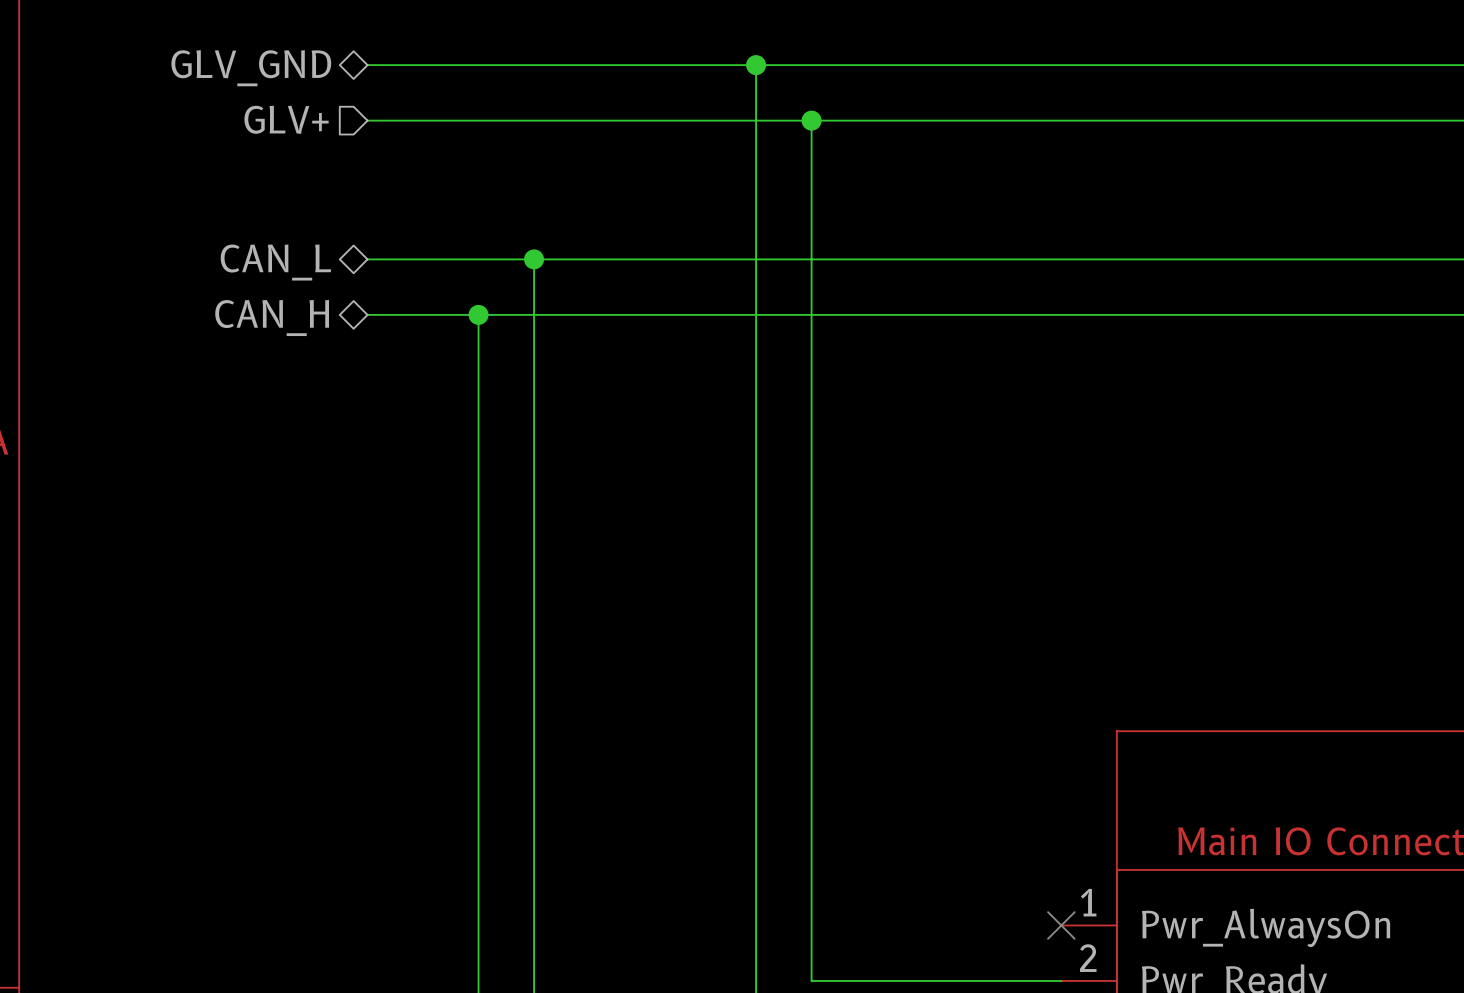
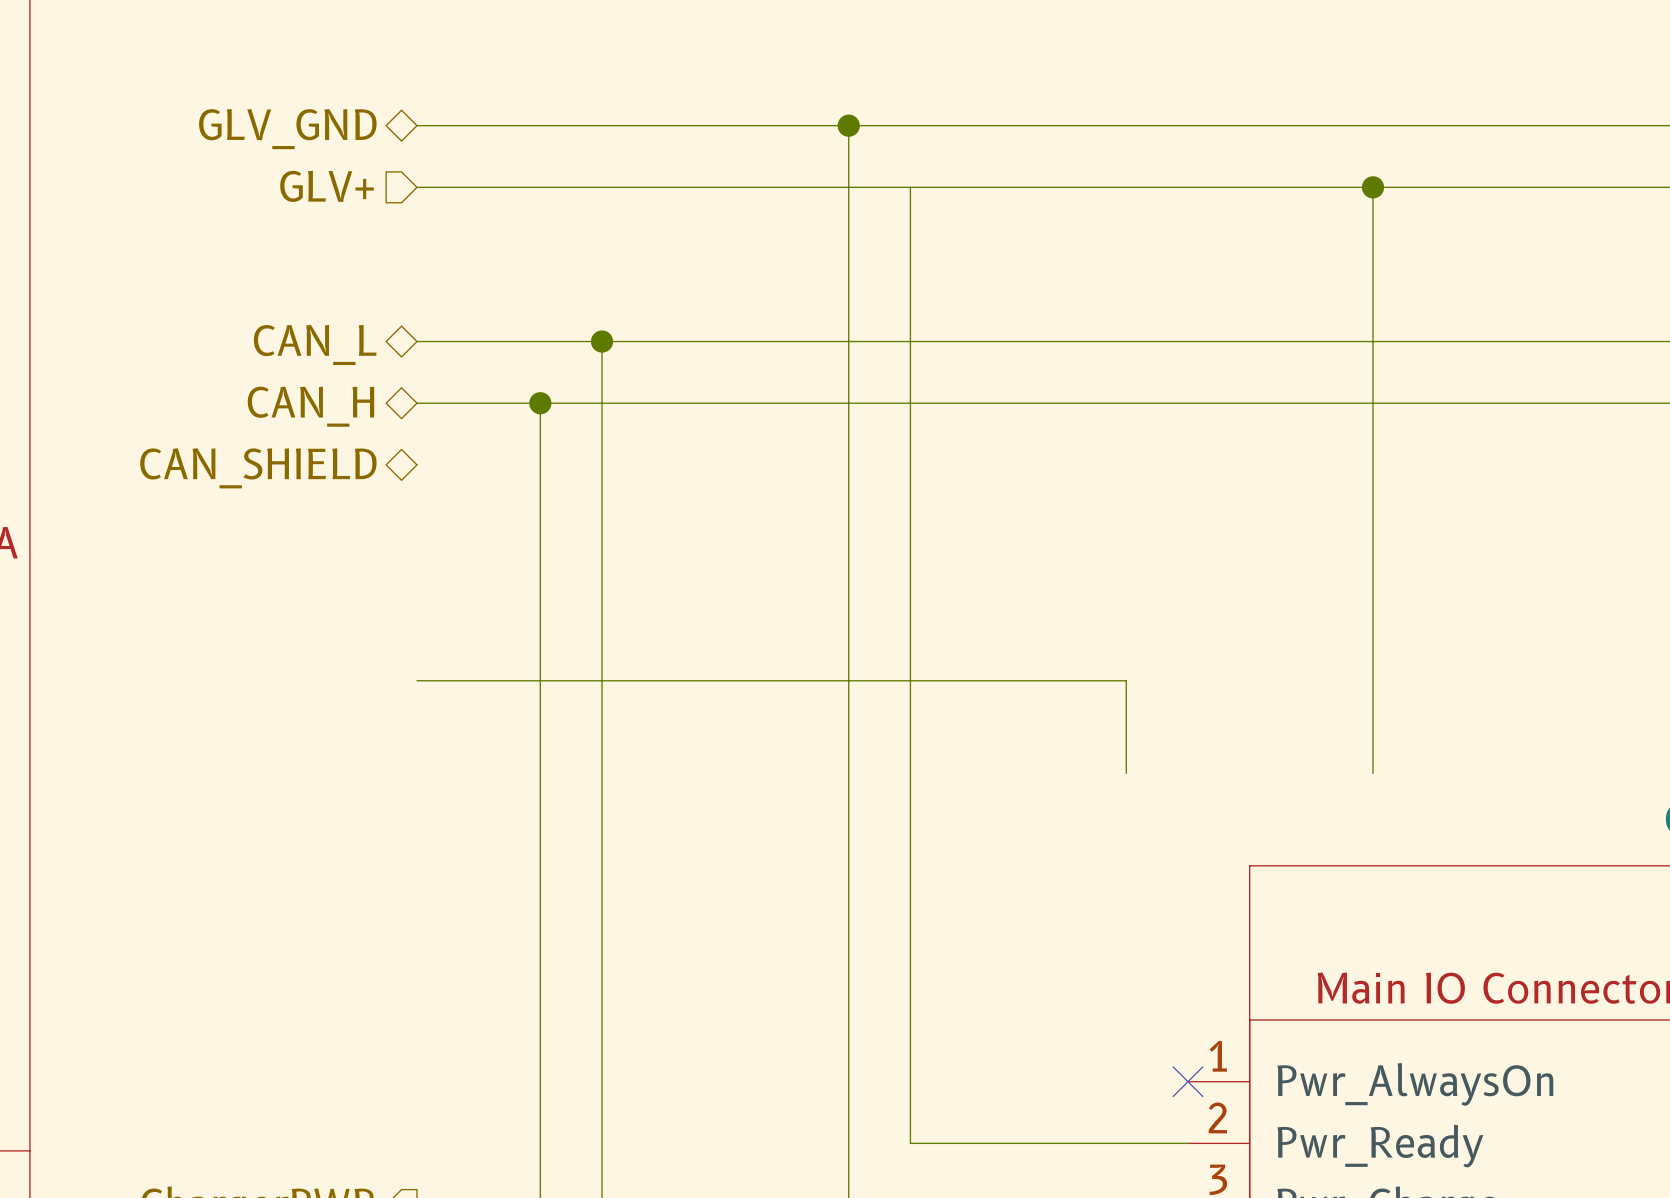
junction: (811, 120) -> none
wire: none -> (1373, 187) (1373, 773)
junction: none -> (1373, 187)
hierarchical label: none -> CAN_SHIELD (258, 468)
wire: none -> (416, 680) (1126, 680) (1126, 773)

